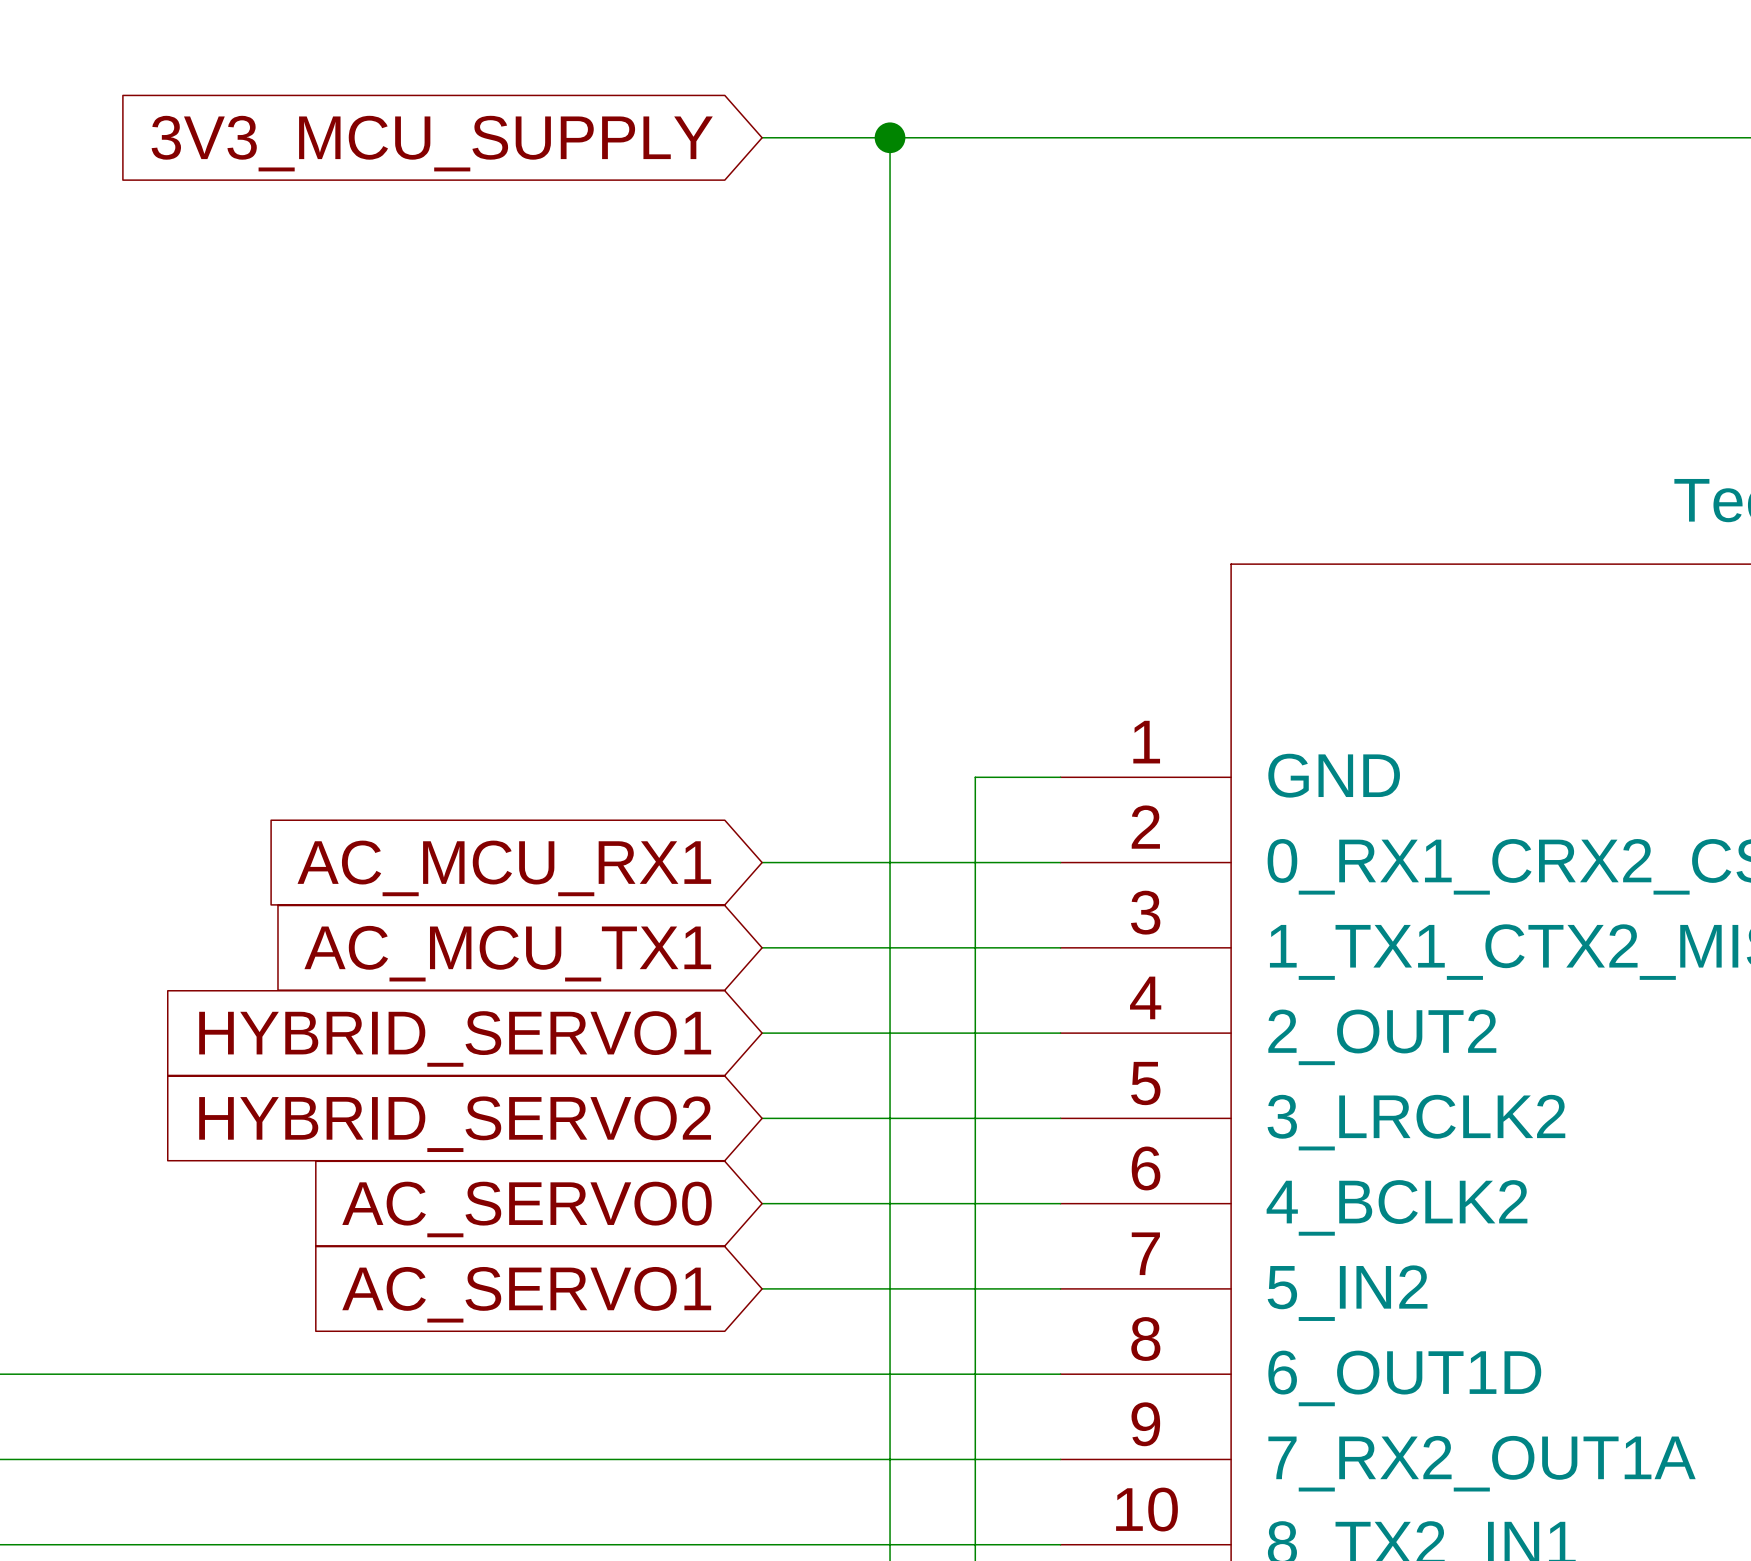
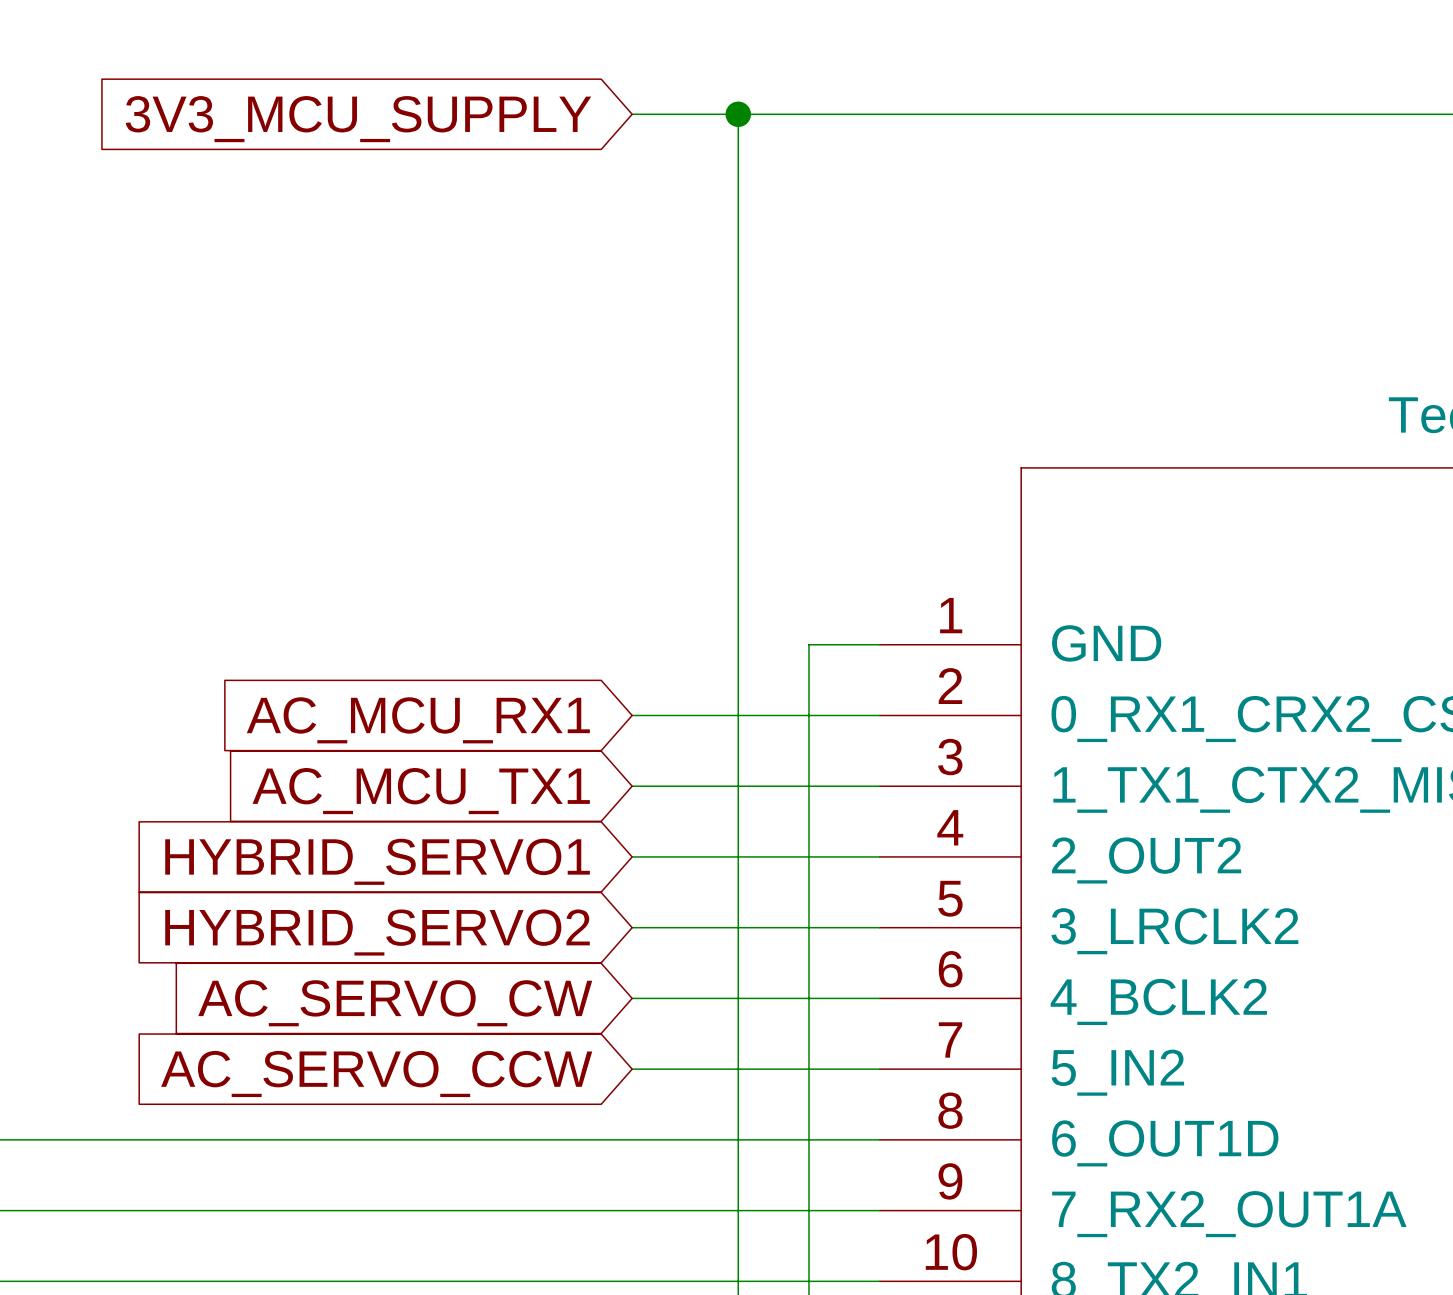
global label: AC_SERVO0 (527, 1209) -> AC_SERVO_CW (395, 1003)
global label: AC_SERVO1 (526, 1294) -> AC_SERVO_CCW (376, 1073)

